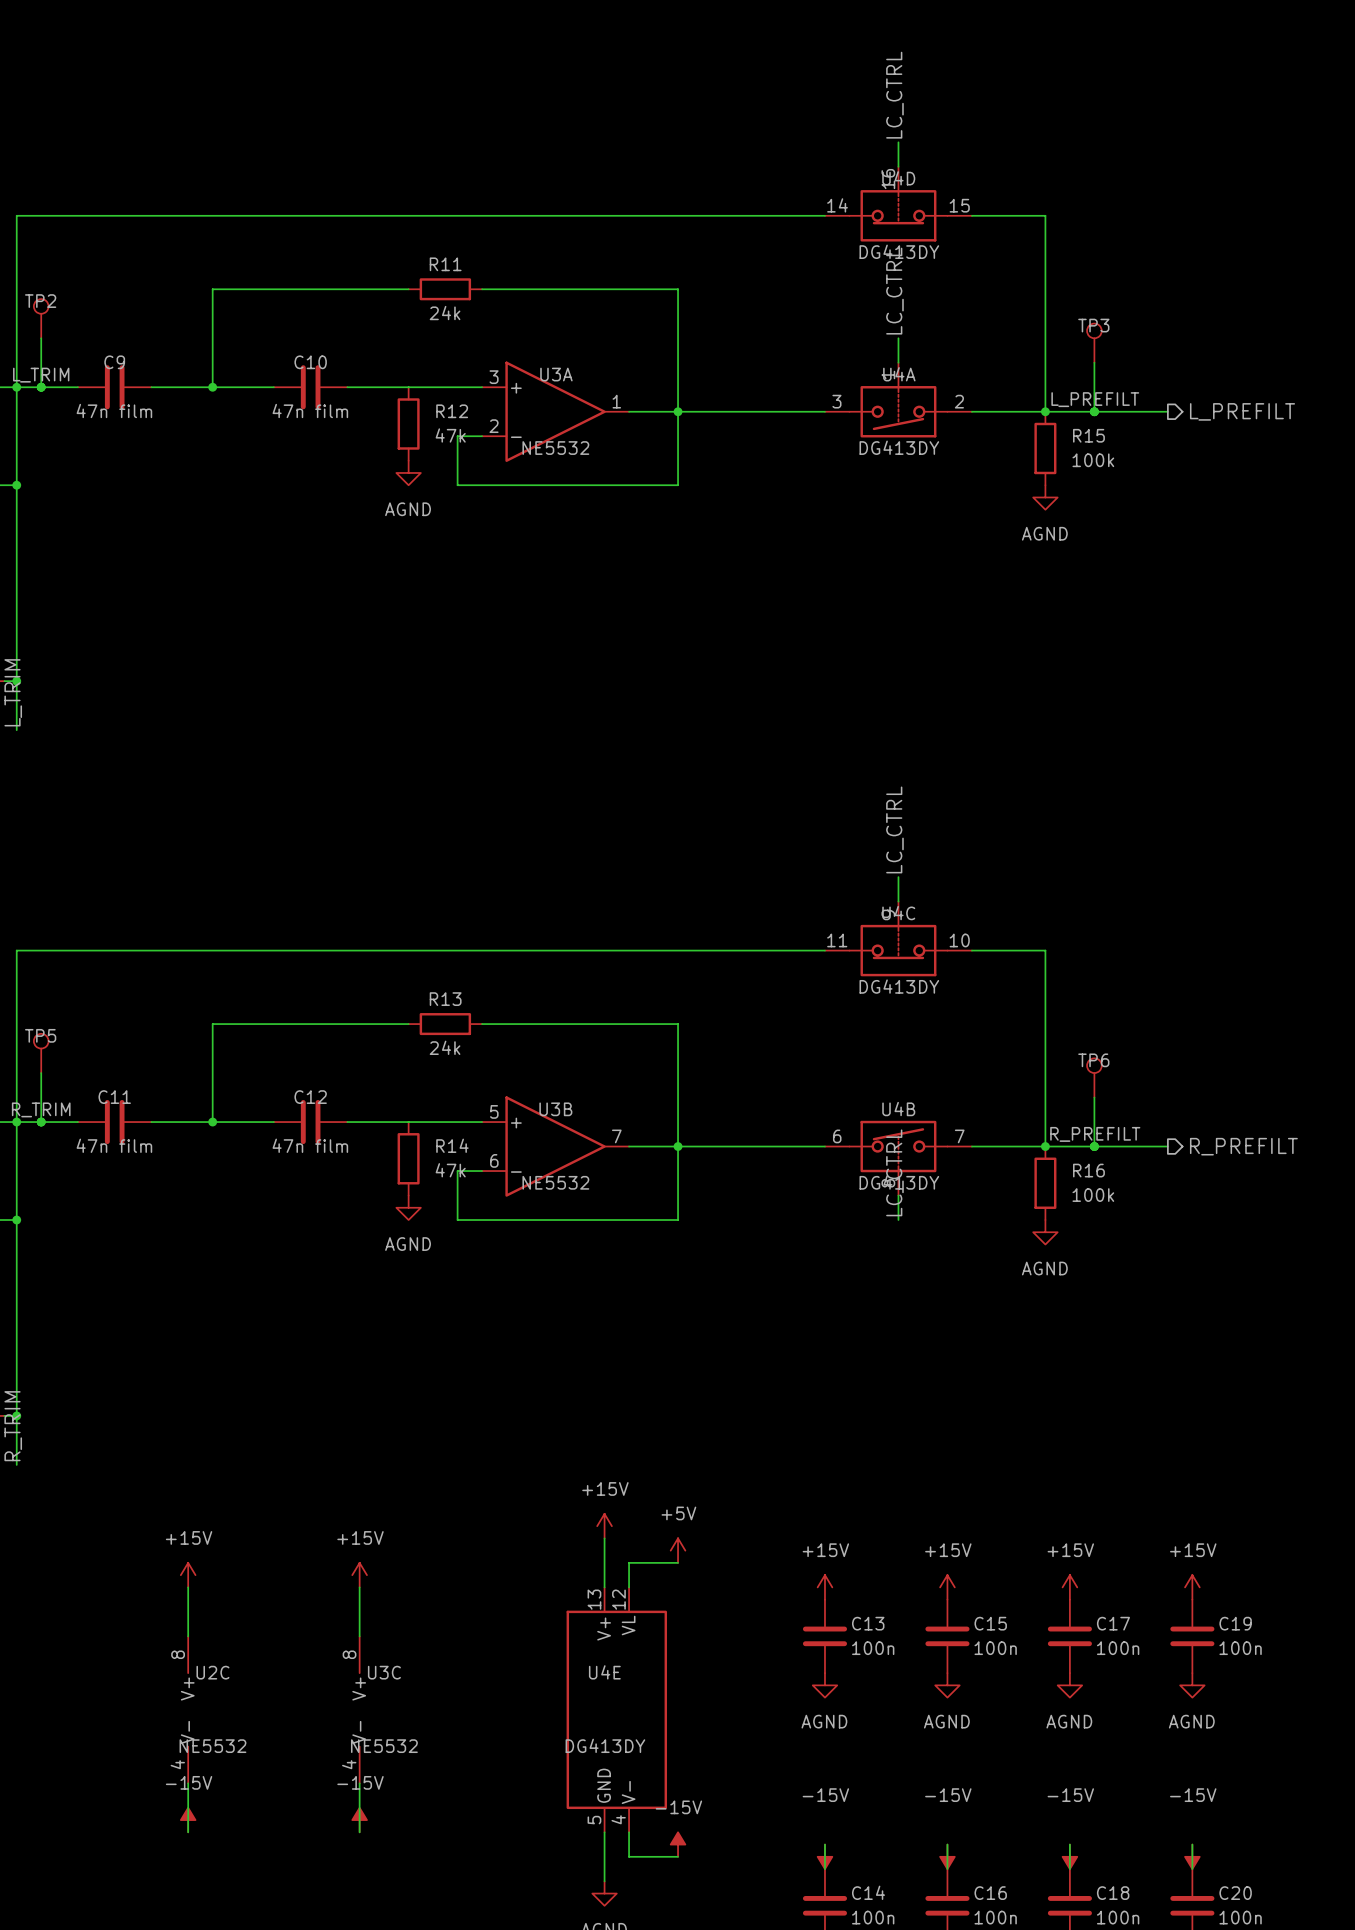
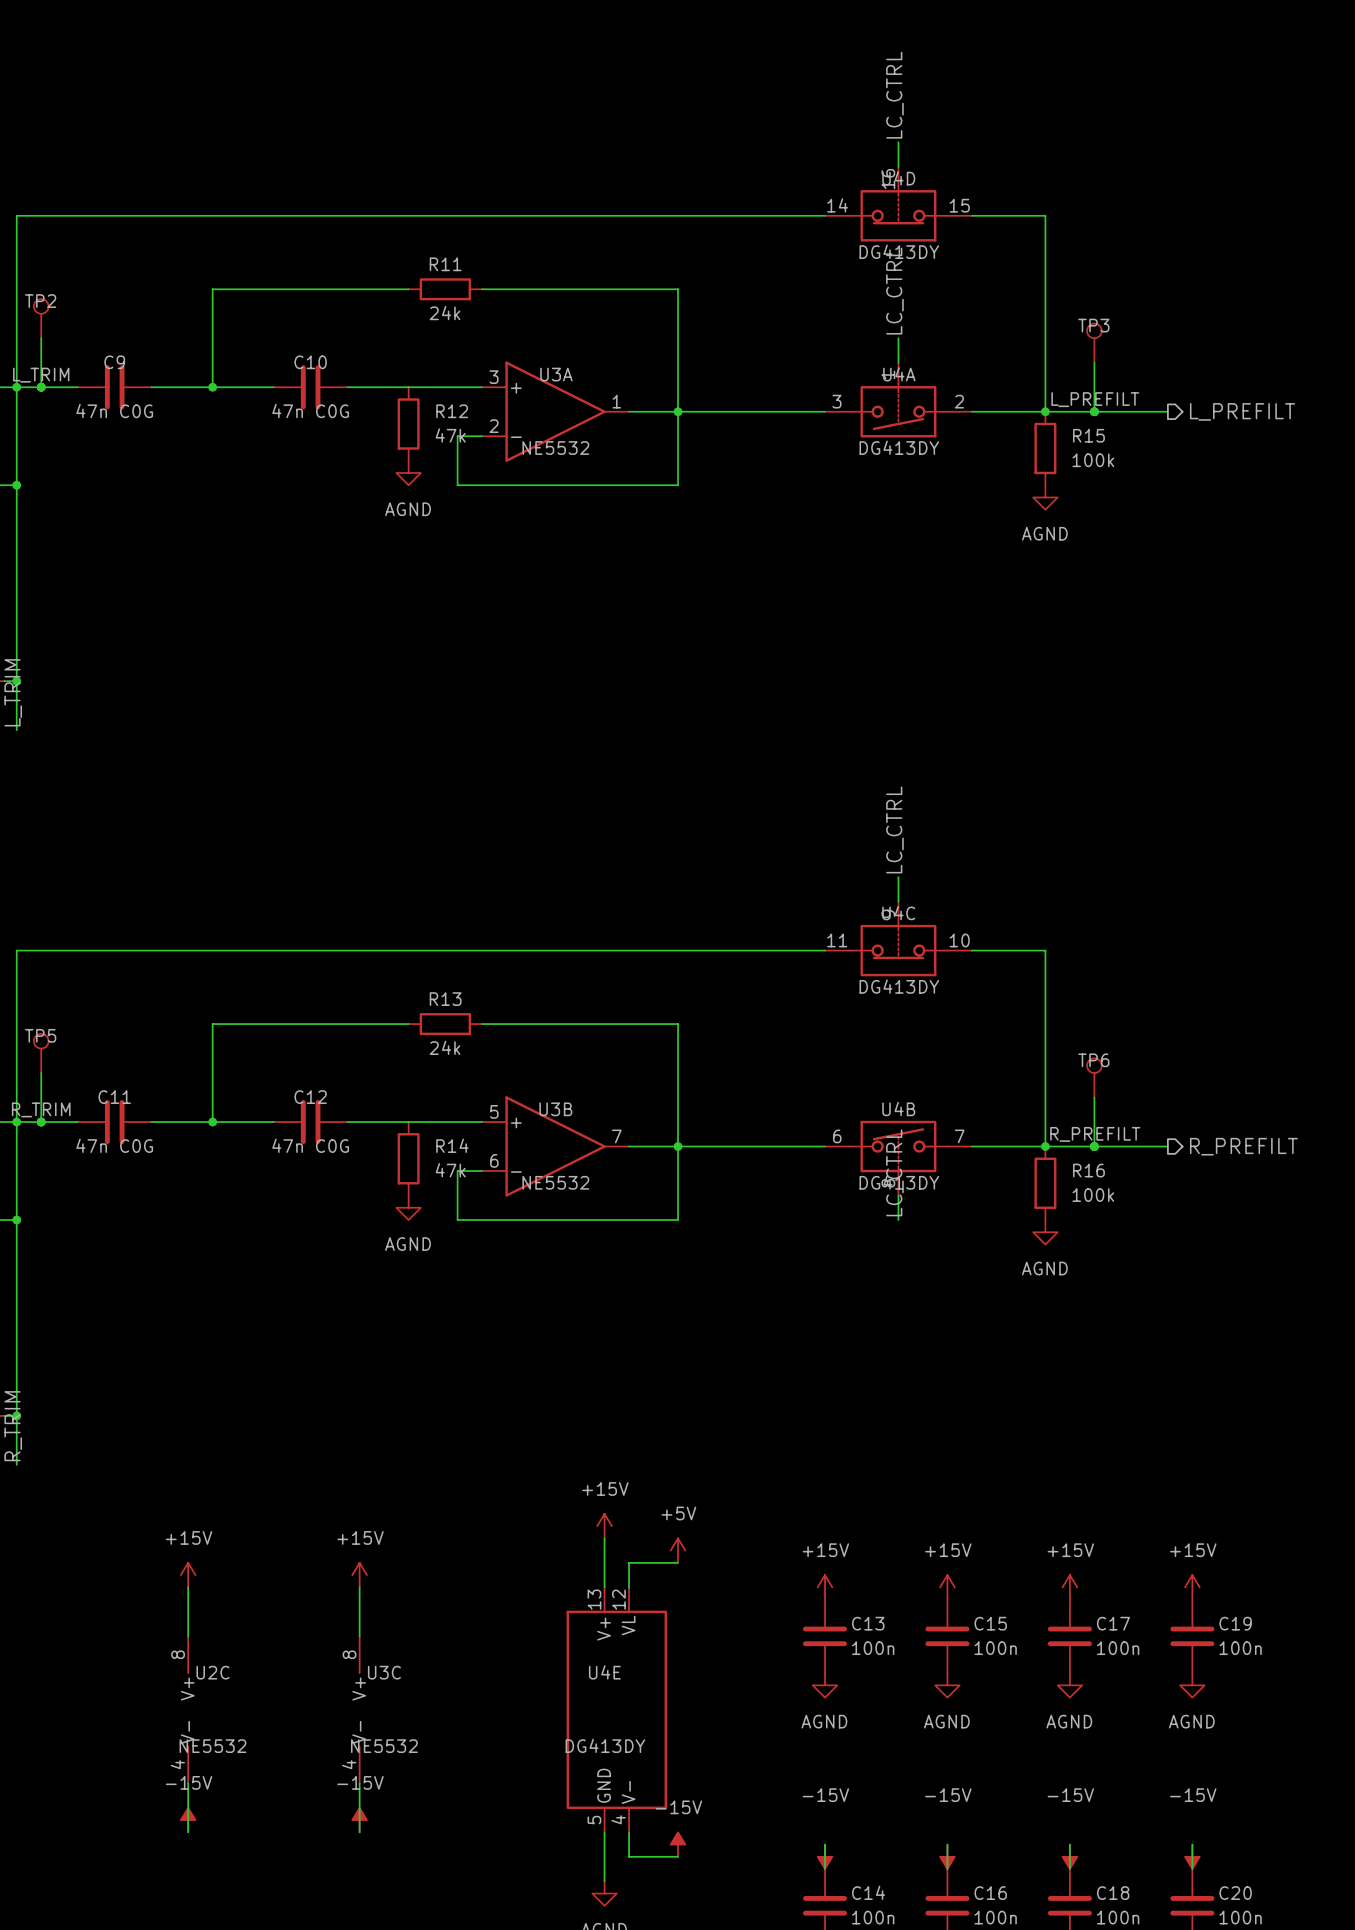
C9 value: 47n film (114, 410) -> 47n C0G (114, 410)
C10 value: 47n film (310, 410) -> 47n C0G (310, 410)
C11 value: 47n film (114, 1145) -> 47n C0G (114, 1145)
C12 value: 47n film (310, 1145) -> 47n C0G (310, 1145)

